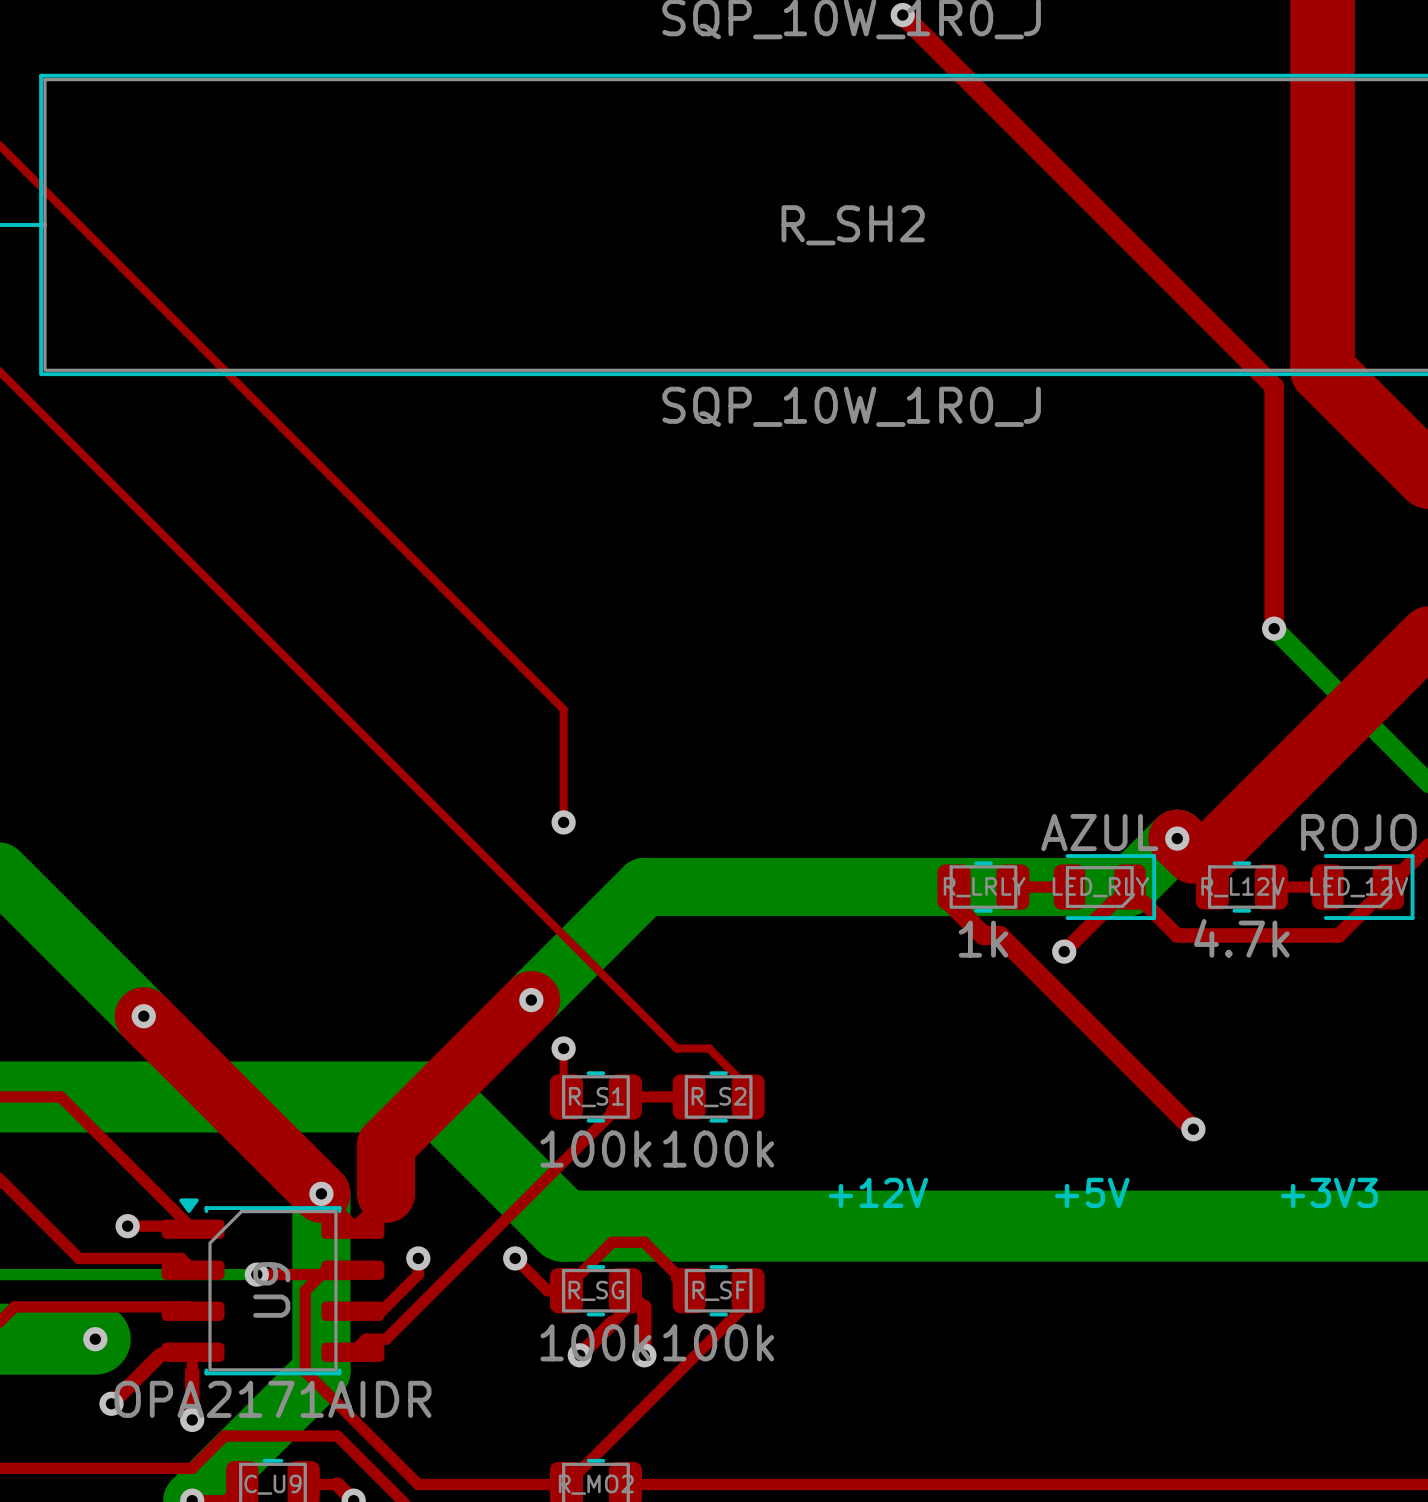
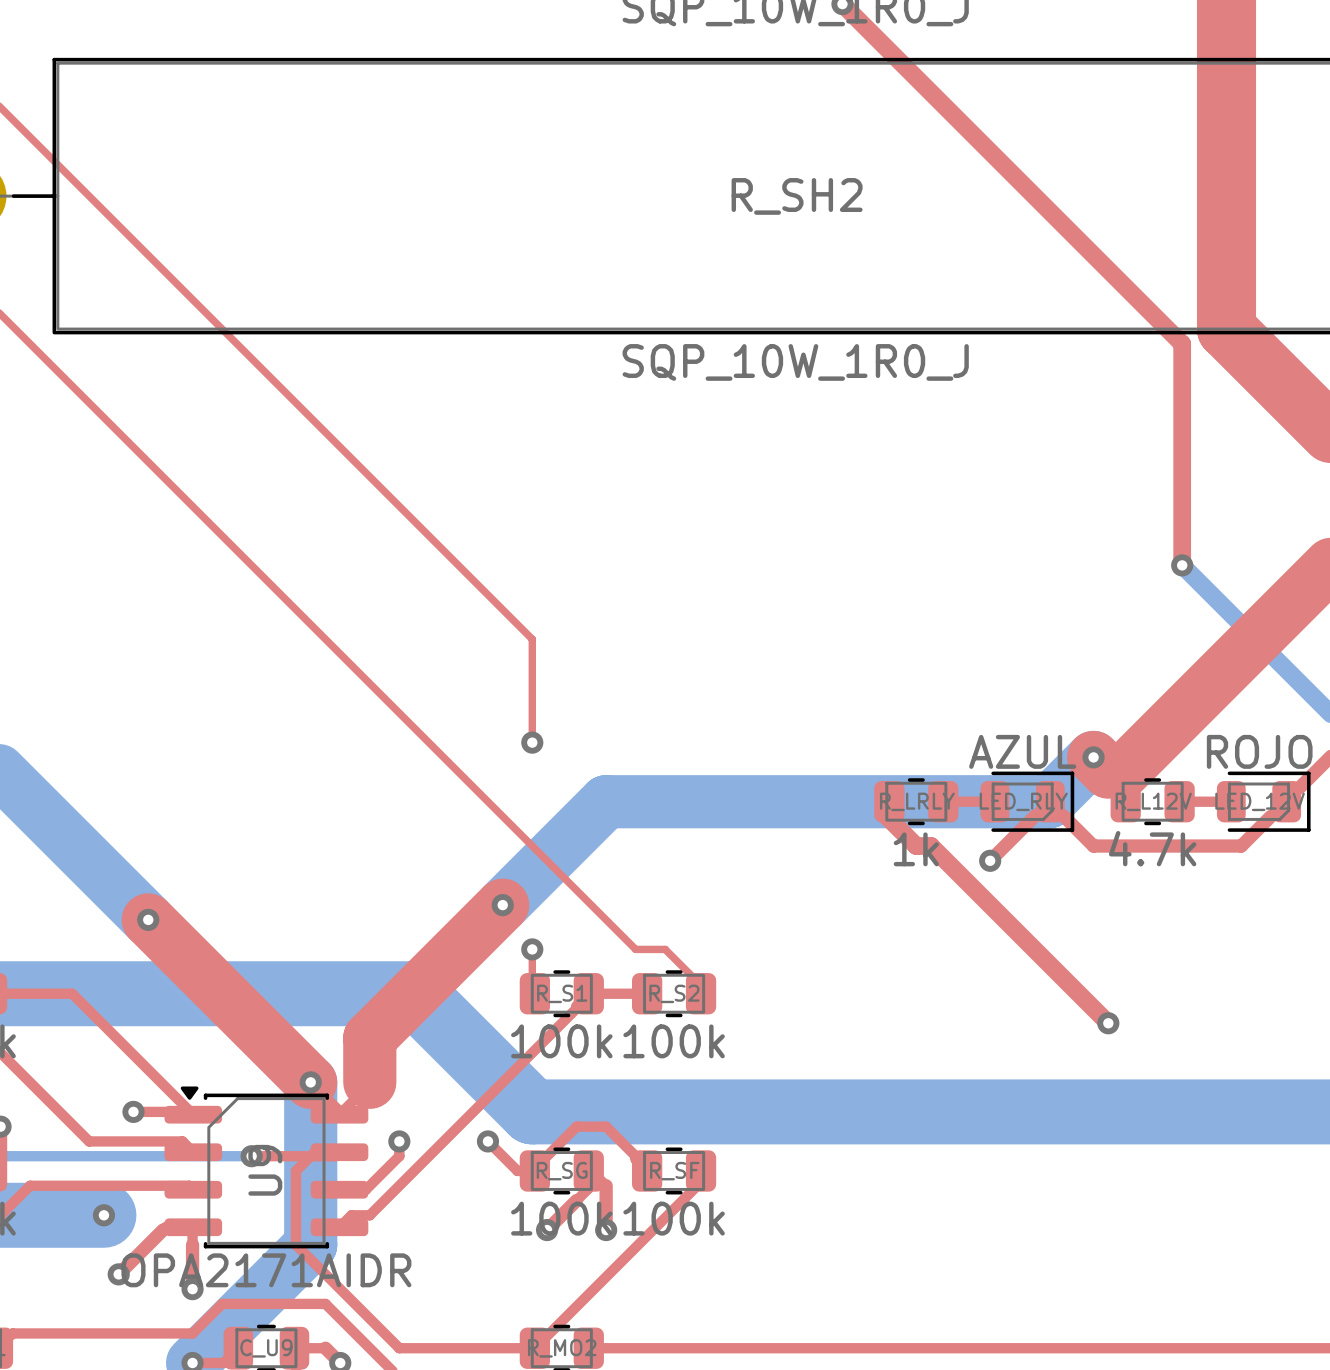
text: +12V (878, 1192) -> none
text: +5V (1092, 1192) -> none
text: +3V3 (1329, 1192) -> none

